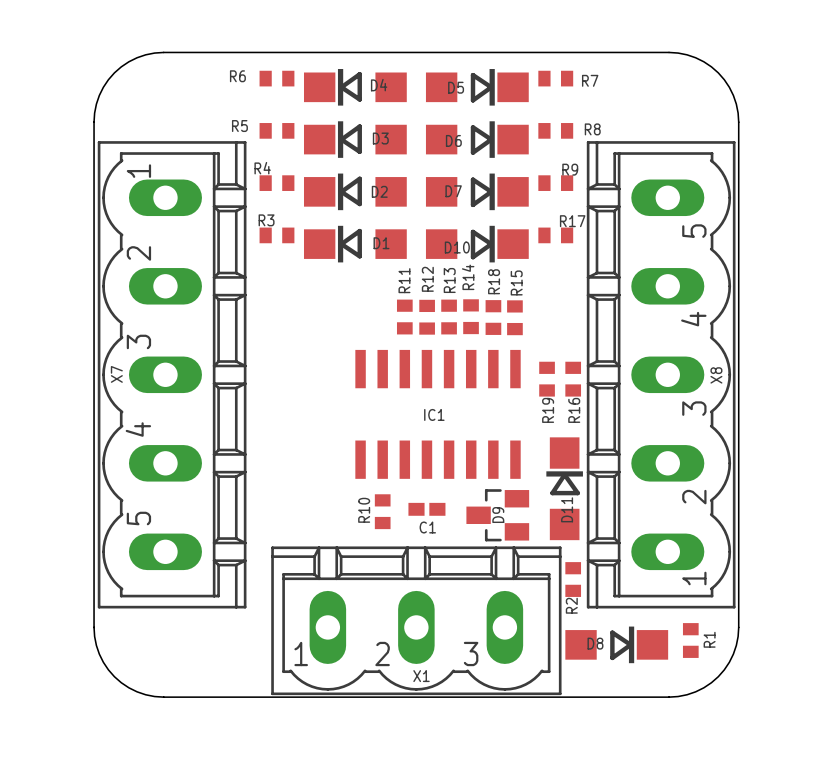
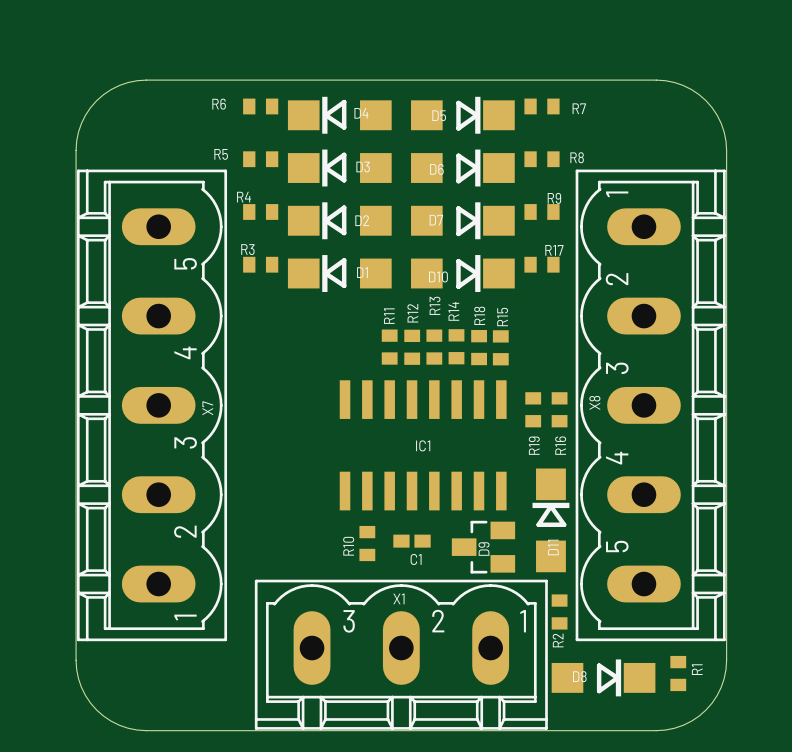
X7 footprint: [97, 141, 247, 609] -> [76, 169, 228, 642]
X8 footprint: [586, 141, 736, 609] -> [575, 169, 726, 642]
X7 name position: X7 (116, 374) -> X7 (207, 408)
X8 name position: X8 (716, 375) -> X8 (594, 402)
X1 footprint: [271, 546, 562, 696] -> [254, 579, 548, 730]
X1 name position: X1 (421, 676) -> X1 (398, 598)

